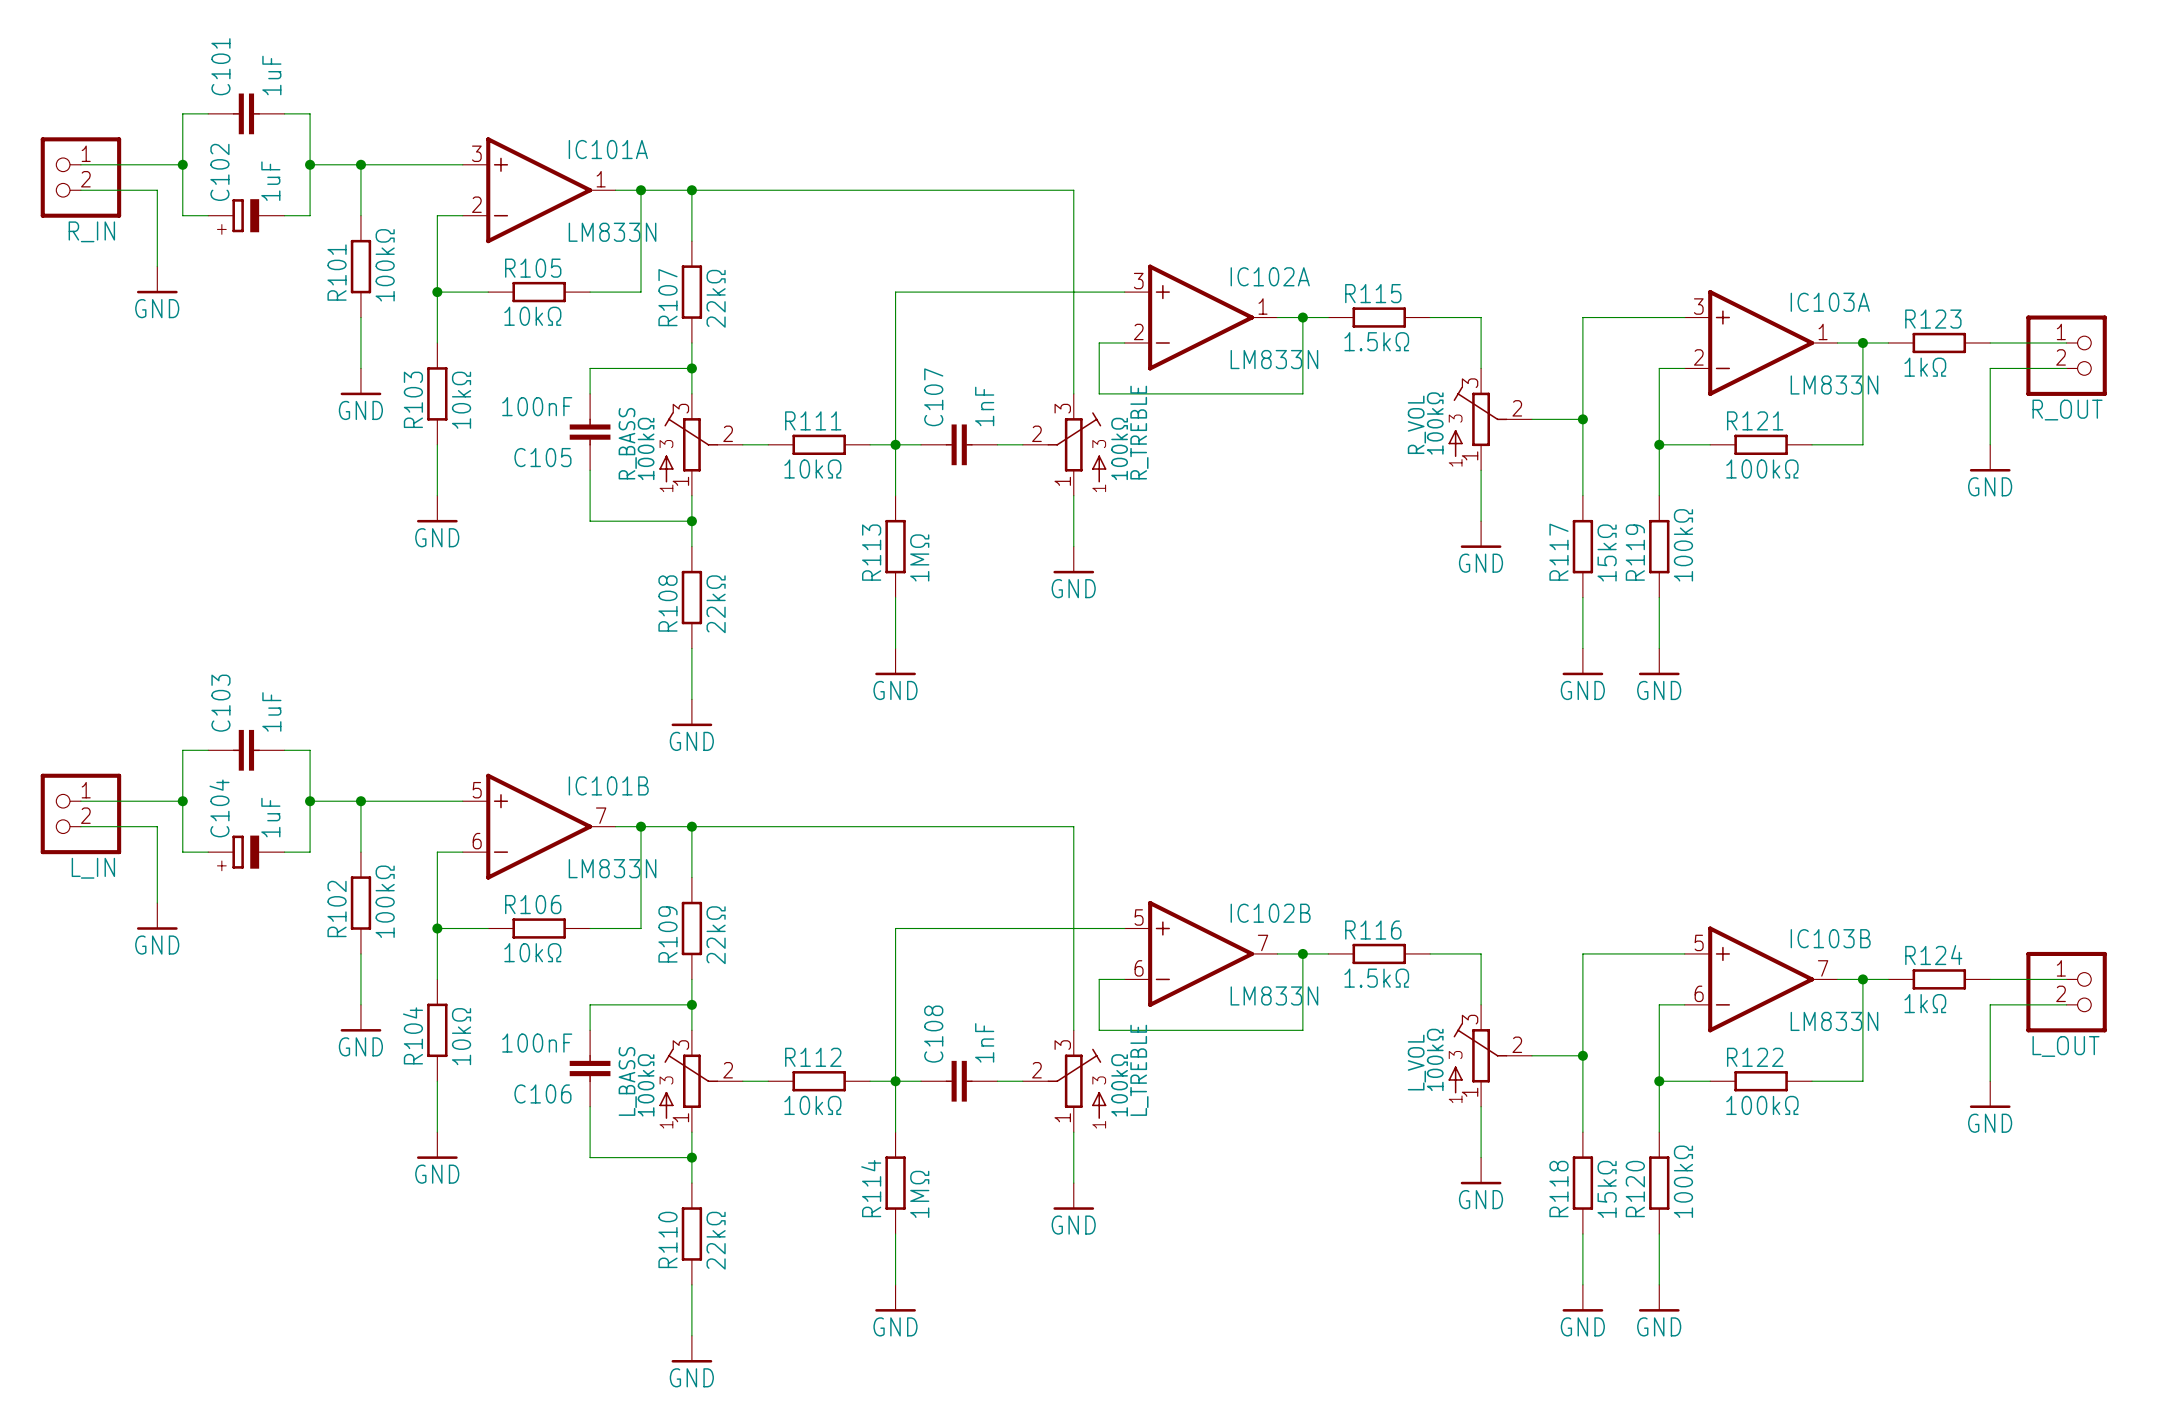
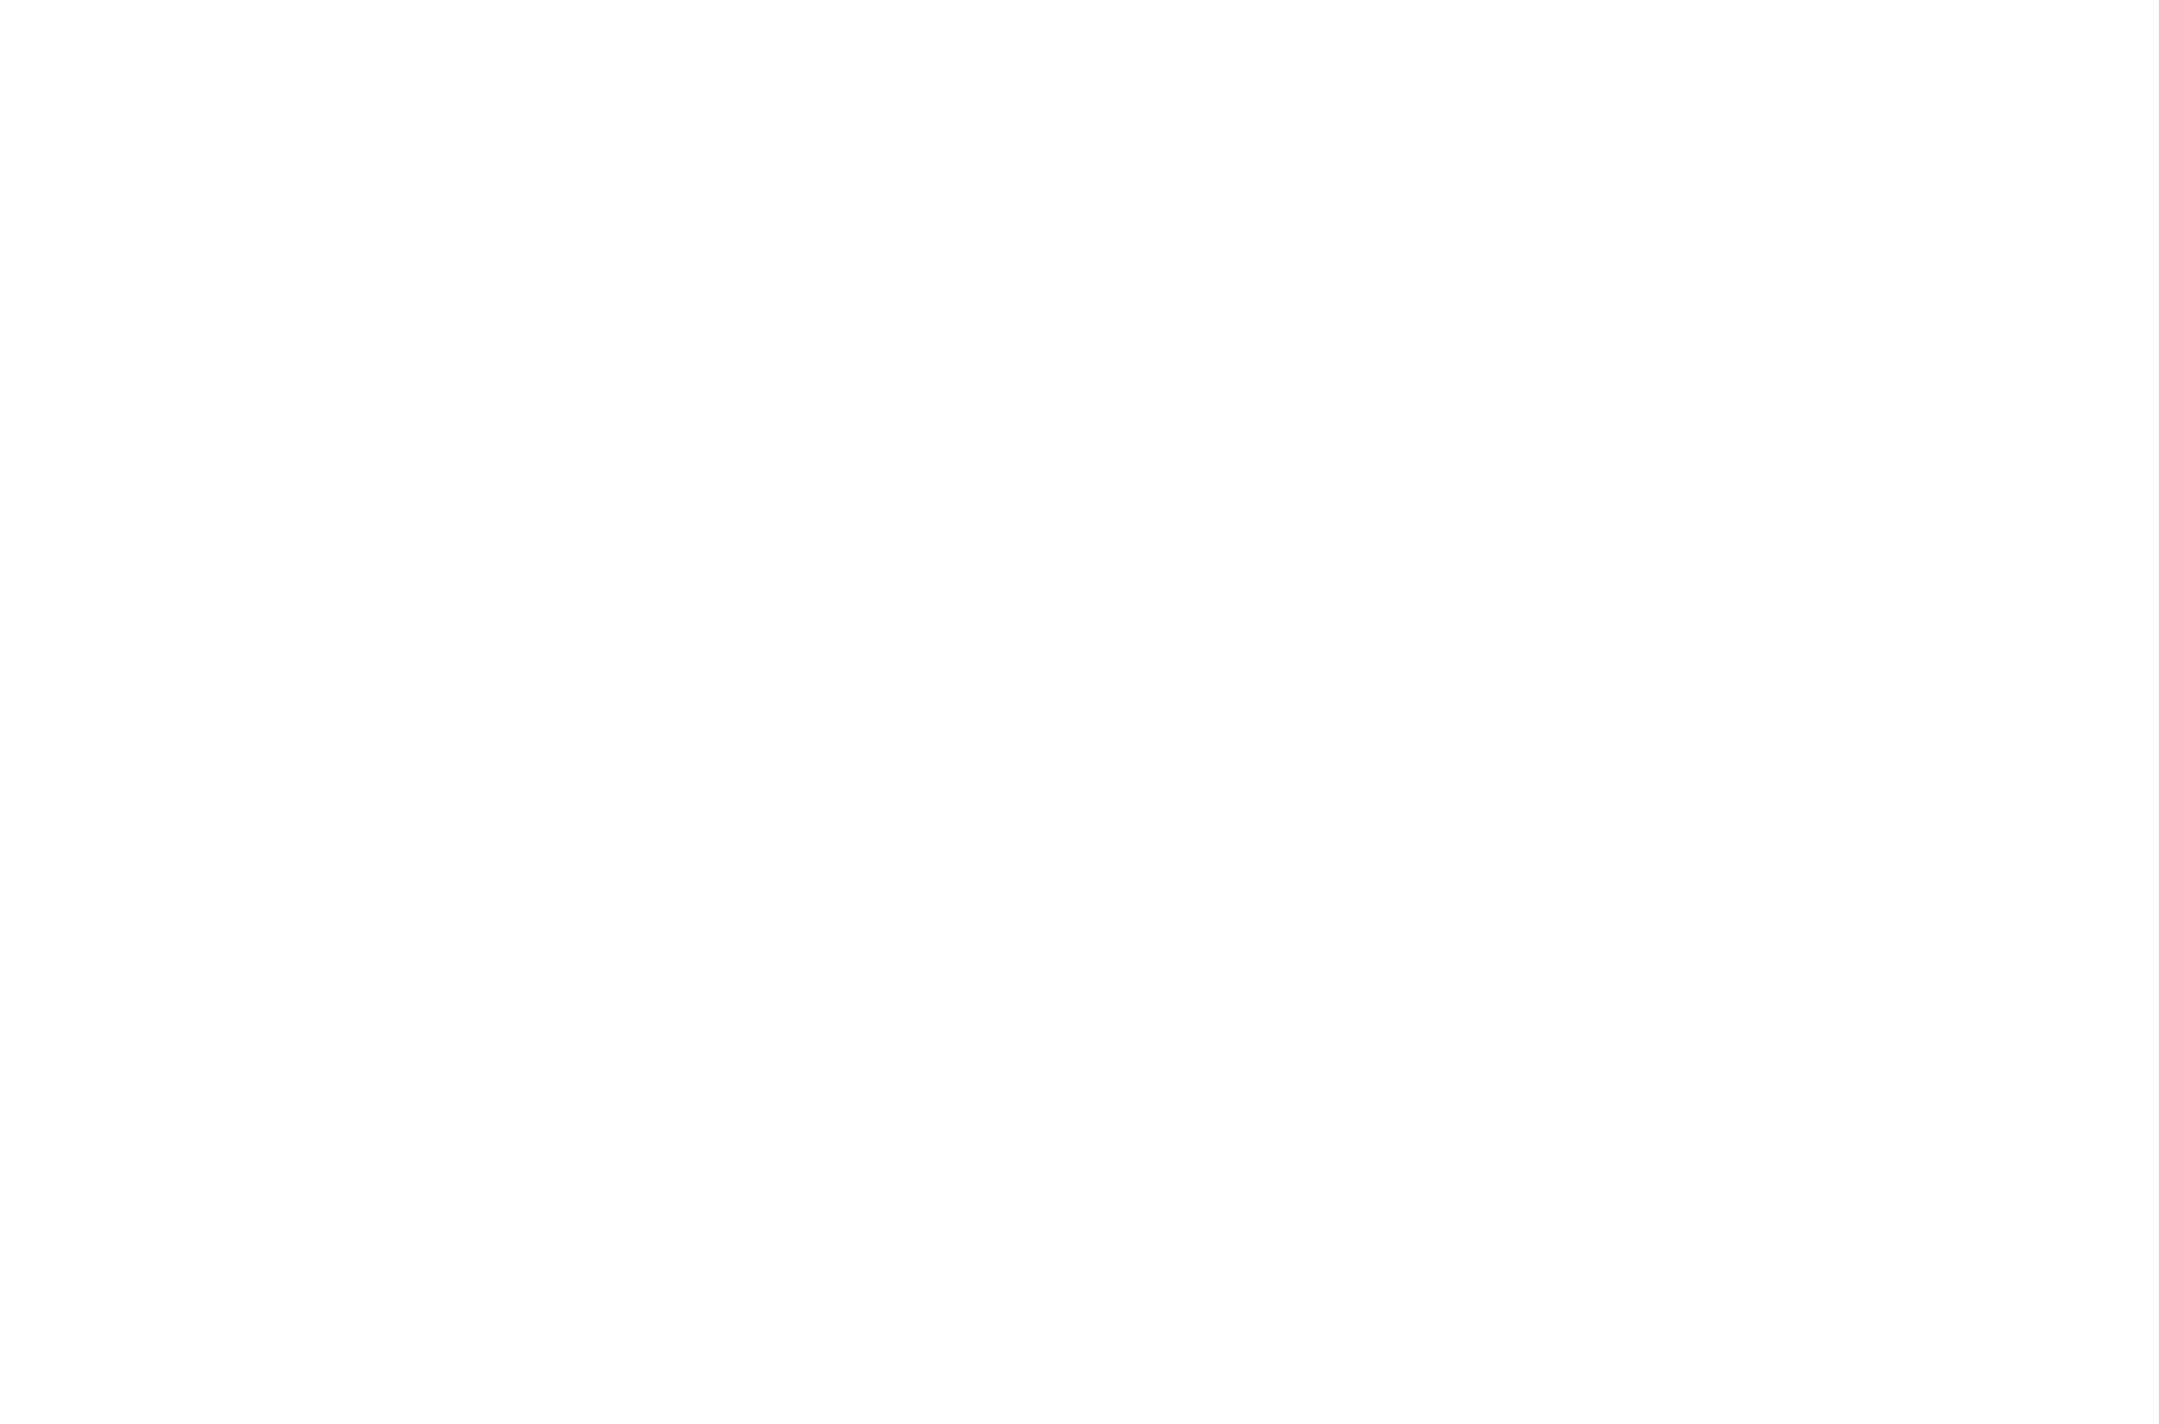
wire: (208, 113) (182, 113) (182, 215) (208, 215) -> none
C101: 1uF (246, 113) -> none
wire: (284, 113) (310, 113) (310, 215) (284, 215) -> none
wire: (80, 164) (182, 164) -> none
junction: (182, 164) -> none
wire: (310, 164) (462, 164) -> none
junction: (310, 164) -> none
wire: (360, 164) (360, 215) -> none
junction: (360, 164) -> none
R_IN: (80, 177) -> none
wire: (80, 190) (157, 190) (157, 266) -> none
IC101A: LM833N (539, 190) -> none
wire: (615, 190) (1073, 190) (1073, 393) -> none
wire: (641, 190) (641, 292) (590, 292) -> none
junction: (641, 190) -> none
wire: (691, 190) (691, 241) -> none
junction: (691, 190) -> none
C102: 1uF (246, 215) -> none
wire: (462, 215) (437, 215) (437, 342) -> none
R101: 100kΩ (360, 266) -> none
power symbol: GND (157, 279) -> none
wire: (437, 292) (488, 292) -> none
junction: (437, 292) -> none
R105: 10kΩ (539, 292) -> none
R107: 22kΩ (691, 292) -> none
wire: (1124, 292) (895, 292) (895, 495) -> none
wire: (360, 317) (360, 368) -> none
IC102A: LM833N (1201, 317) -> none
wire: (1277, 317) (1328, 317) -> none
wire: (1302, 317) (1302, 393) (1099, 393) (1099, 342) (1124, 342) -> none
junction: (1302, 317) -> none
R115: 1.5kΩ (1379, 317) -> none
wire: (1430, 317) (1481, 317) (1481, 368) -> none
wire: (1684, 317) (1582, 317) (1582, 495) -> none
wire: (691, 342) (691, 393) -> none
IC103A: LM833N (1761, 342) -> none
wire: (1837, 342) (1888, 342) -> none
wire: (1862, 342) (1862, 444) (1812, 444) -> none
junction: (1862, 342) -> none
R123: 1kΩ (1939, 342) -> none
wire: (1990, 342) (2066, 342) -> none
R_OUT: (2066, 355) -> none
wire: (691, 368) (590, 368) (590, 393) -> none
junction: (691, 368) -> none
wire: (1684, 368) (1659, 368) (1659, 495) -> none
wire: (2066, 368) (1990, 368) (1990, 444) -> none
power symbol: GND (360, 381) -> none
R103: 10kΩ (437, 393) -> none
R_VOL: 100kΩ (1490, 419) -> none
wire: (1531, 419) (1582, 419) -> none
junction: (1582, 419) -> none
C105: 100nF (590, 432) -> none
wire: (437, 444) (437, 495) -> none
R_BASS: 100kΩ (701, 444) -> none
wire: (742, 444) (768, 444) -> none
R111: 10kΩ (819, 444) -> none
wire: (870, 444) (921, 444) -> none
junction: (895, 444) -> none
C107: 1nF (959, 444) -> none
wire: (997, 444) (1022, 444) -> none
R_TREBLE: 100kΩ (1064, 444) -> none
wire: (1659, 444) (1710, 444) -> none
junction: (1659, 444) -> none
R121: 100kΩ (1761, 444) -> none
power symbol: GND (1990, 458) -> none
wire: (590, 470) (590, 521) (691, 521) -> none
wire: (1481, 470) (1481, 521) -> none
wire: (691, 495) (691, 546) -> none
wire: (1073, 495) (1073, 546) -> none
power symbol: GND (437, 509) -> none
junction: (691, 521) -> none
power symbol: GND (1481, 534) -> none
R113: 1MΩ (895, 546) -> none
R117: 15kΩ (1582, 546) -> none
R119: 100kΩ (1659, 546) -> none
power symbol: GND (1073, 560) -> none
R108: 22kΩ (691, 597) -> none
wire: (895, 597) (895, 648) -> none
wire: (1582, 597) (1582, 648) -> none
wire: (1659, 597) (1659, 648) -> none
wire: (691, 648) (691, 699) -> none
power symbol: GND (895, 661) -> none
power symbol: GND (1582, 661) -> none
power symbol: GND (1659, 661) -> none
power symbol: GND (691, 712) -> none
wire: (208, 750) (182, 750) (182, 852) (208, 852) -> none
C103: 1uF (246, 750) -> none
wire: (284, 750) (310, 750) (310, 852) (284, 852) -> none
wire: (80, 801) (182, 801) -> none
junction: (182, 801) -> none
wire: (310, 801) (462, 801) -> none
junction: (310, 801) -> none
wire: (360, 801) (360, 852) -> none
junction: (360, 801) -> none
L_IN: (80, 813) -> none
wire: (80, 826) (157, 826) (157, 903) -> none
IC101B: LM833N (539, 826) -> none
wire: (615, 826) (1073, 826) (1073, 1030) -> none
wire: (641, 826) (641, 928) (590, 928) -> none
junction: (641, 826) -> none
wire: (691, 826) (691, 877) -> none
junction: (691, 826) -> none
C104: 1uF (246, 852) -> none
wire: (462, 852) (437, 852) (437, 979) -> none
R102: 100kΩ (360, 903) -> none
power symbol: GND (157, 916) -> none
wire: (437, 928) (488, 928) -> none
junction: (437, 928) -> none
R106: 10kΩ (539, 928) -> none
R109: 22kΩ (691, 928) -> none
wire: (1124, 928) (895, 928) (895, 1132) -> none
wire: (360, 953) (360, 1004) -> none
IC102B: LM833N (1201, 953) -> none
wire: (1277, 953) (1328, 953) -> none
wire: (1302, 953) (1302, 1030) (1099, 1030) (1099, 979) (1124, 979) -> none
junction: (1302, 953) -> none
R116: 1.5kΩ (1379, 953) -> none
wire: (1430, 953) (1481, 953) (1481, 1004) -> none
wire: (1684, 953) (1582, 953) (1582, 1132) -> none
wire: (691, 979) (691, 1030) -> none
IC103B: LM833N (1761, 979) -> none
wire: (1837, 979) (1888, 979) -> none
wire: (1862, 979) (1862, 1081) (1812, 1081) -> none
junction: (1862, 979) -> none
R124: 1kΩ (1939, 979) -> none
wire: (1990, 979) (2066, 979) -> none
L_OUT: (2066, 992) -> none
wire: (691, 1004) (590, 1004) (590, 1030) -> none
junction: (691, 1004) -> none
wire: (1684, 1004) (1659, 1004) (1659, 1132) -> none
wire: (2066, 1004) (1990, 1004) (1990, 1081) -> none
power symbol: GND (360, 1018) -> none
R104: 10kΩ (437, 1030) -> none
L_VOL: 100kΩ (1490, 1055) -> none
wire: (1531, 1055) (1582, 1055) -> none
junction: (1582, 1055) -> none
C106: 100nF (590, 1068) -> none
wire: (437, 1081) (437, 1132) -> none
L_BASS: 100kΩ (701, 1081) -> none
wire: (742, 1081) (768, 1081) -> none
R112: 10kΩ (819, 1081) -> none
wire: (870, 1081) (921, 1081) -> none
junction: (895, 1081) -> none
C108: 1nF (959, 1081) -> none
wire: (997, 1081) (1022, 1081) -> none
L_TREBLE: 100kΩ (1064, 1081) -> none
wire: (1659, 1081) (1710, 1081) -> none
junction: (1659, 1081) -> none
R122: 100kΩ (1761, 1081) -> none
power symbol: GND (1990, 1094) -> none
wire: (590, 1106) (590, 1157) (691, 1157) -> none
wire: (1481, 1106) (1481, 1157) -> none
wire: (691, 1132) (691, 1183) -> none
wire: (1073, 1132) (1073, 1183) -> none
power symbol: GND (437, 1145) -> none
junction: (691, 1157) -> none
power symbol: GND (1481, 1170) -> none
R114: 1MΩ (895, 1183) -> none
R118: 15kΩ (1582, 1183) -> none
R120: 100kΩ (1659, 1183) -> none
power symbol: GND (1073, 1196) -> none
R110: 22kΩ (691, 1233) -> none
wire: (895, 1233) (895, 1284) -> none
wire: (1582, 1233) (1582, 1284) -> none
wire: (1659, 1233) (1659, 1284) -> none
wire: (691, 1284) (691, 1335) -> none
power symbol: GND (895, 1298) -> none
power symbol: GND (1582, 1298) -> none
power symbol: GND (1659, 1298) -> none
power symbol: GND (691, 1349) -> none

